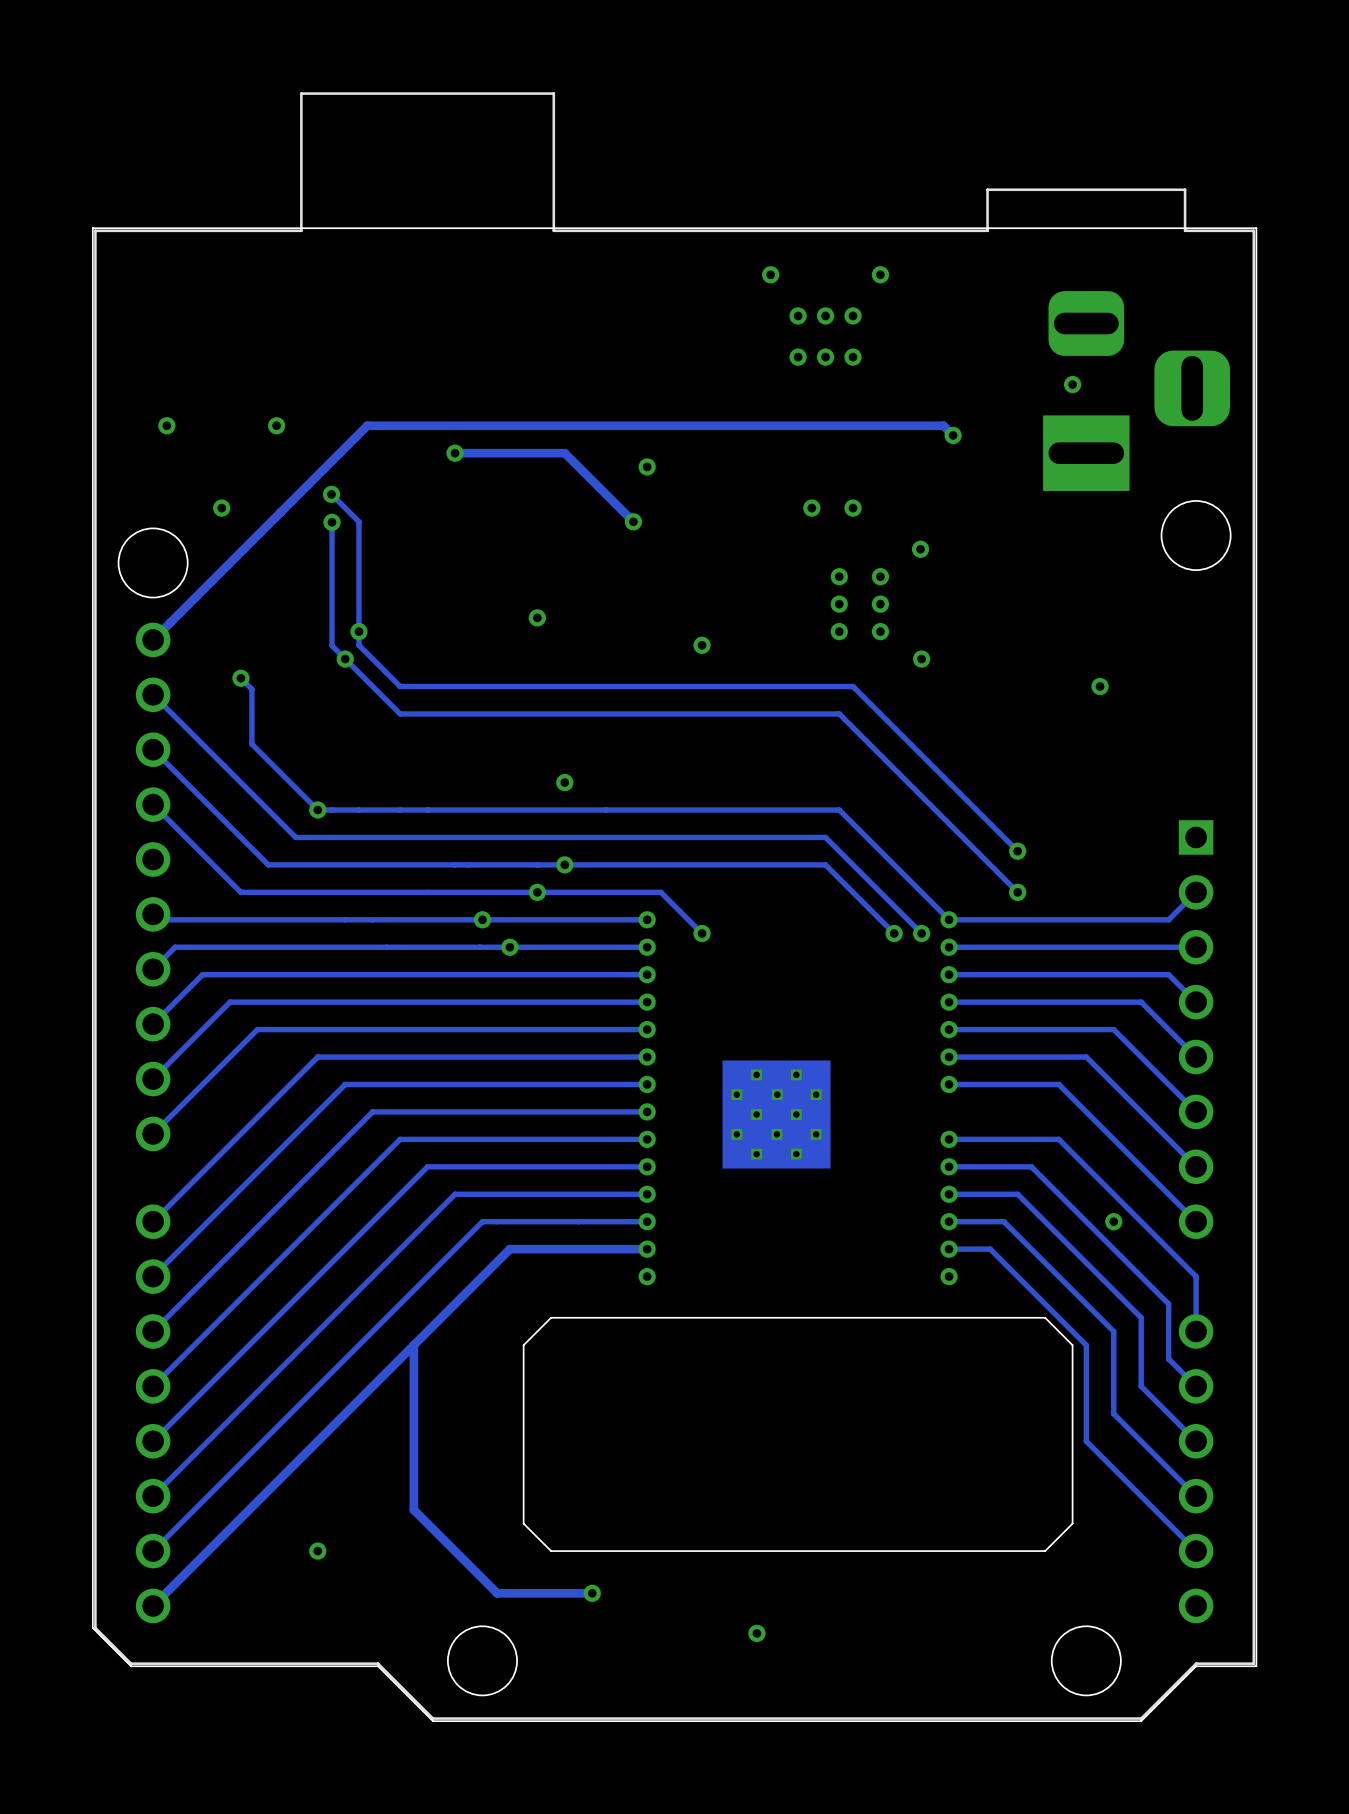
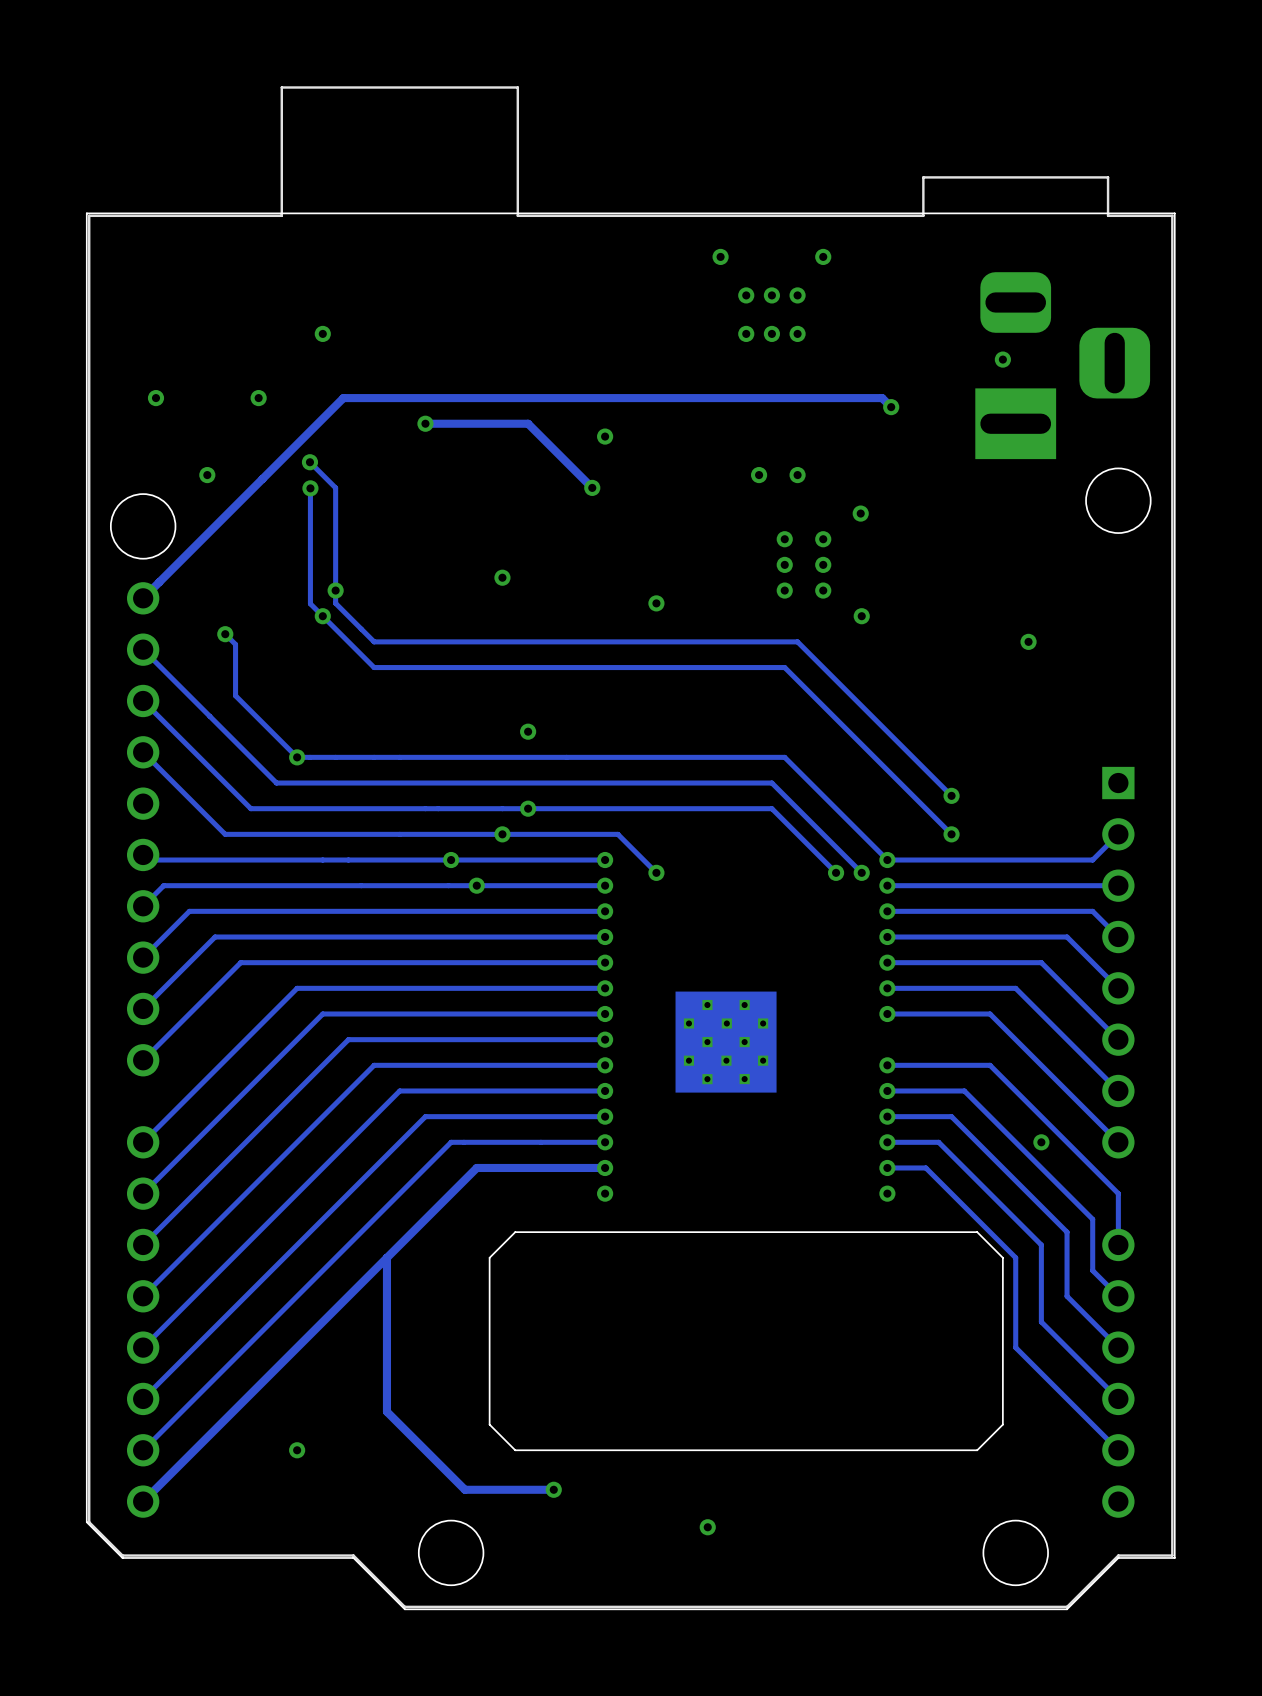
via: none -> (322, 333)

